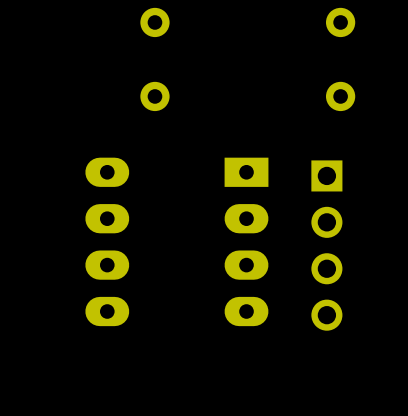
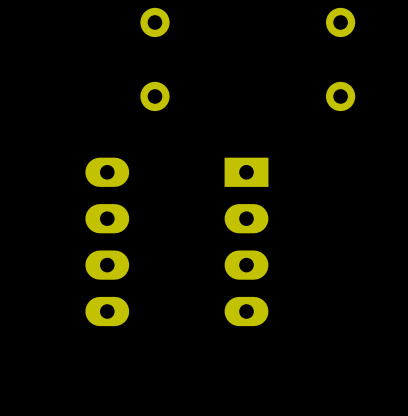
part: (326, 245) -> none

